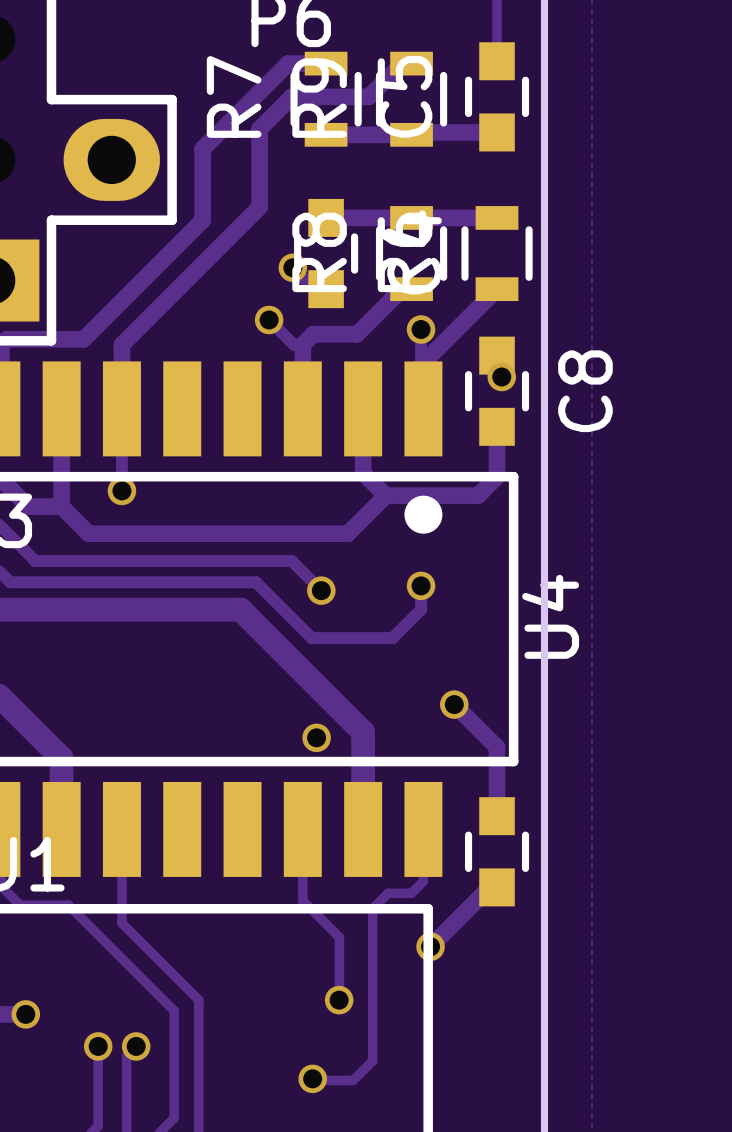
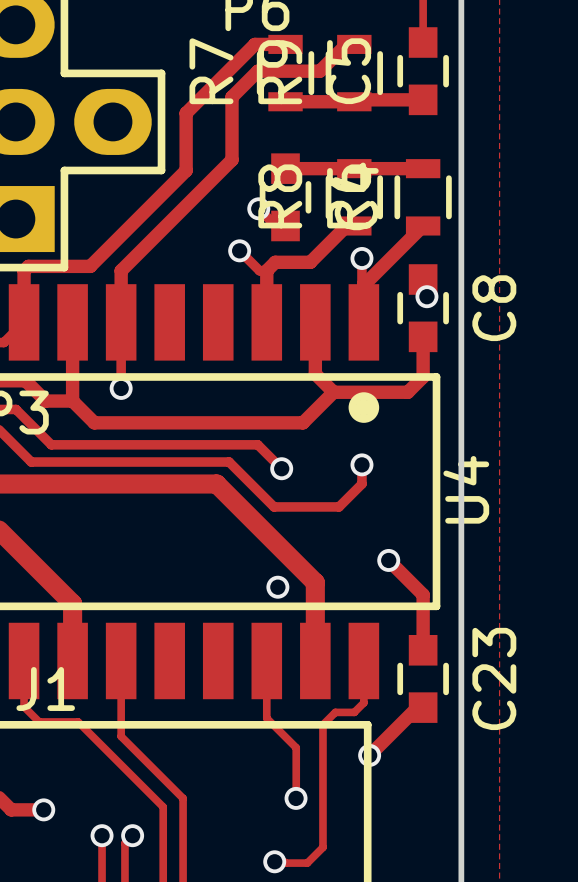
C23 name: none -> C23 (494, 678)

